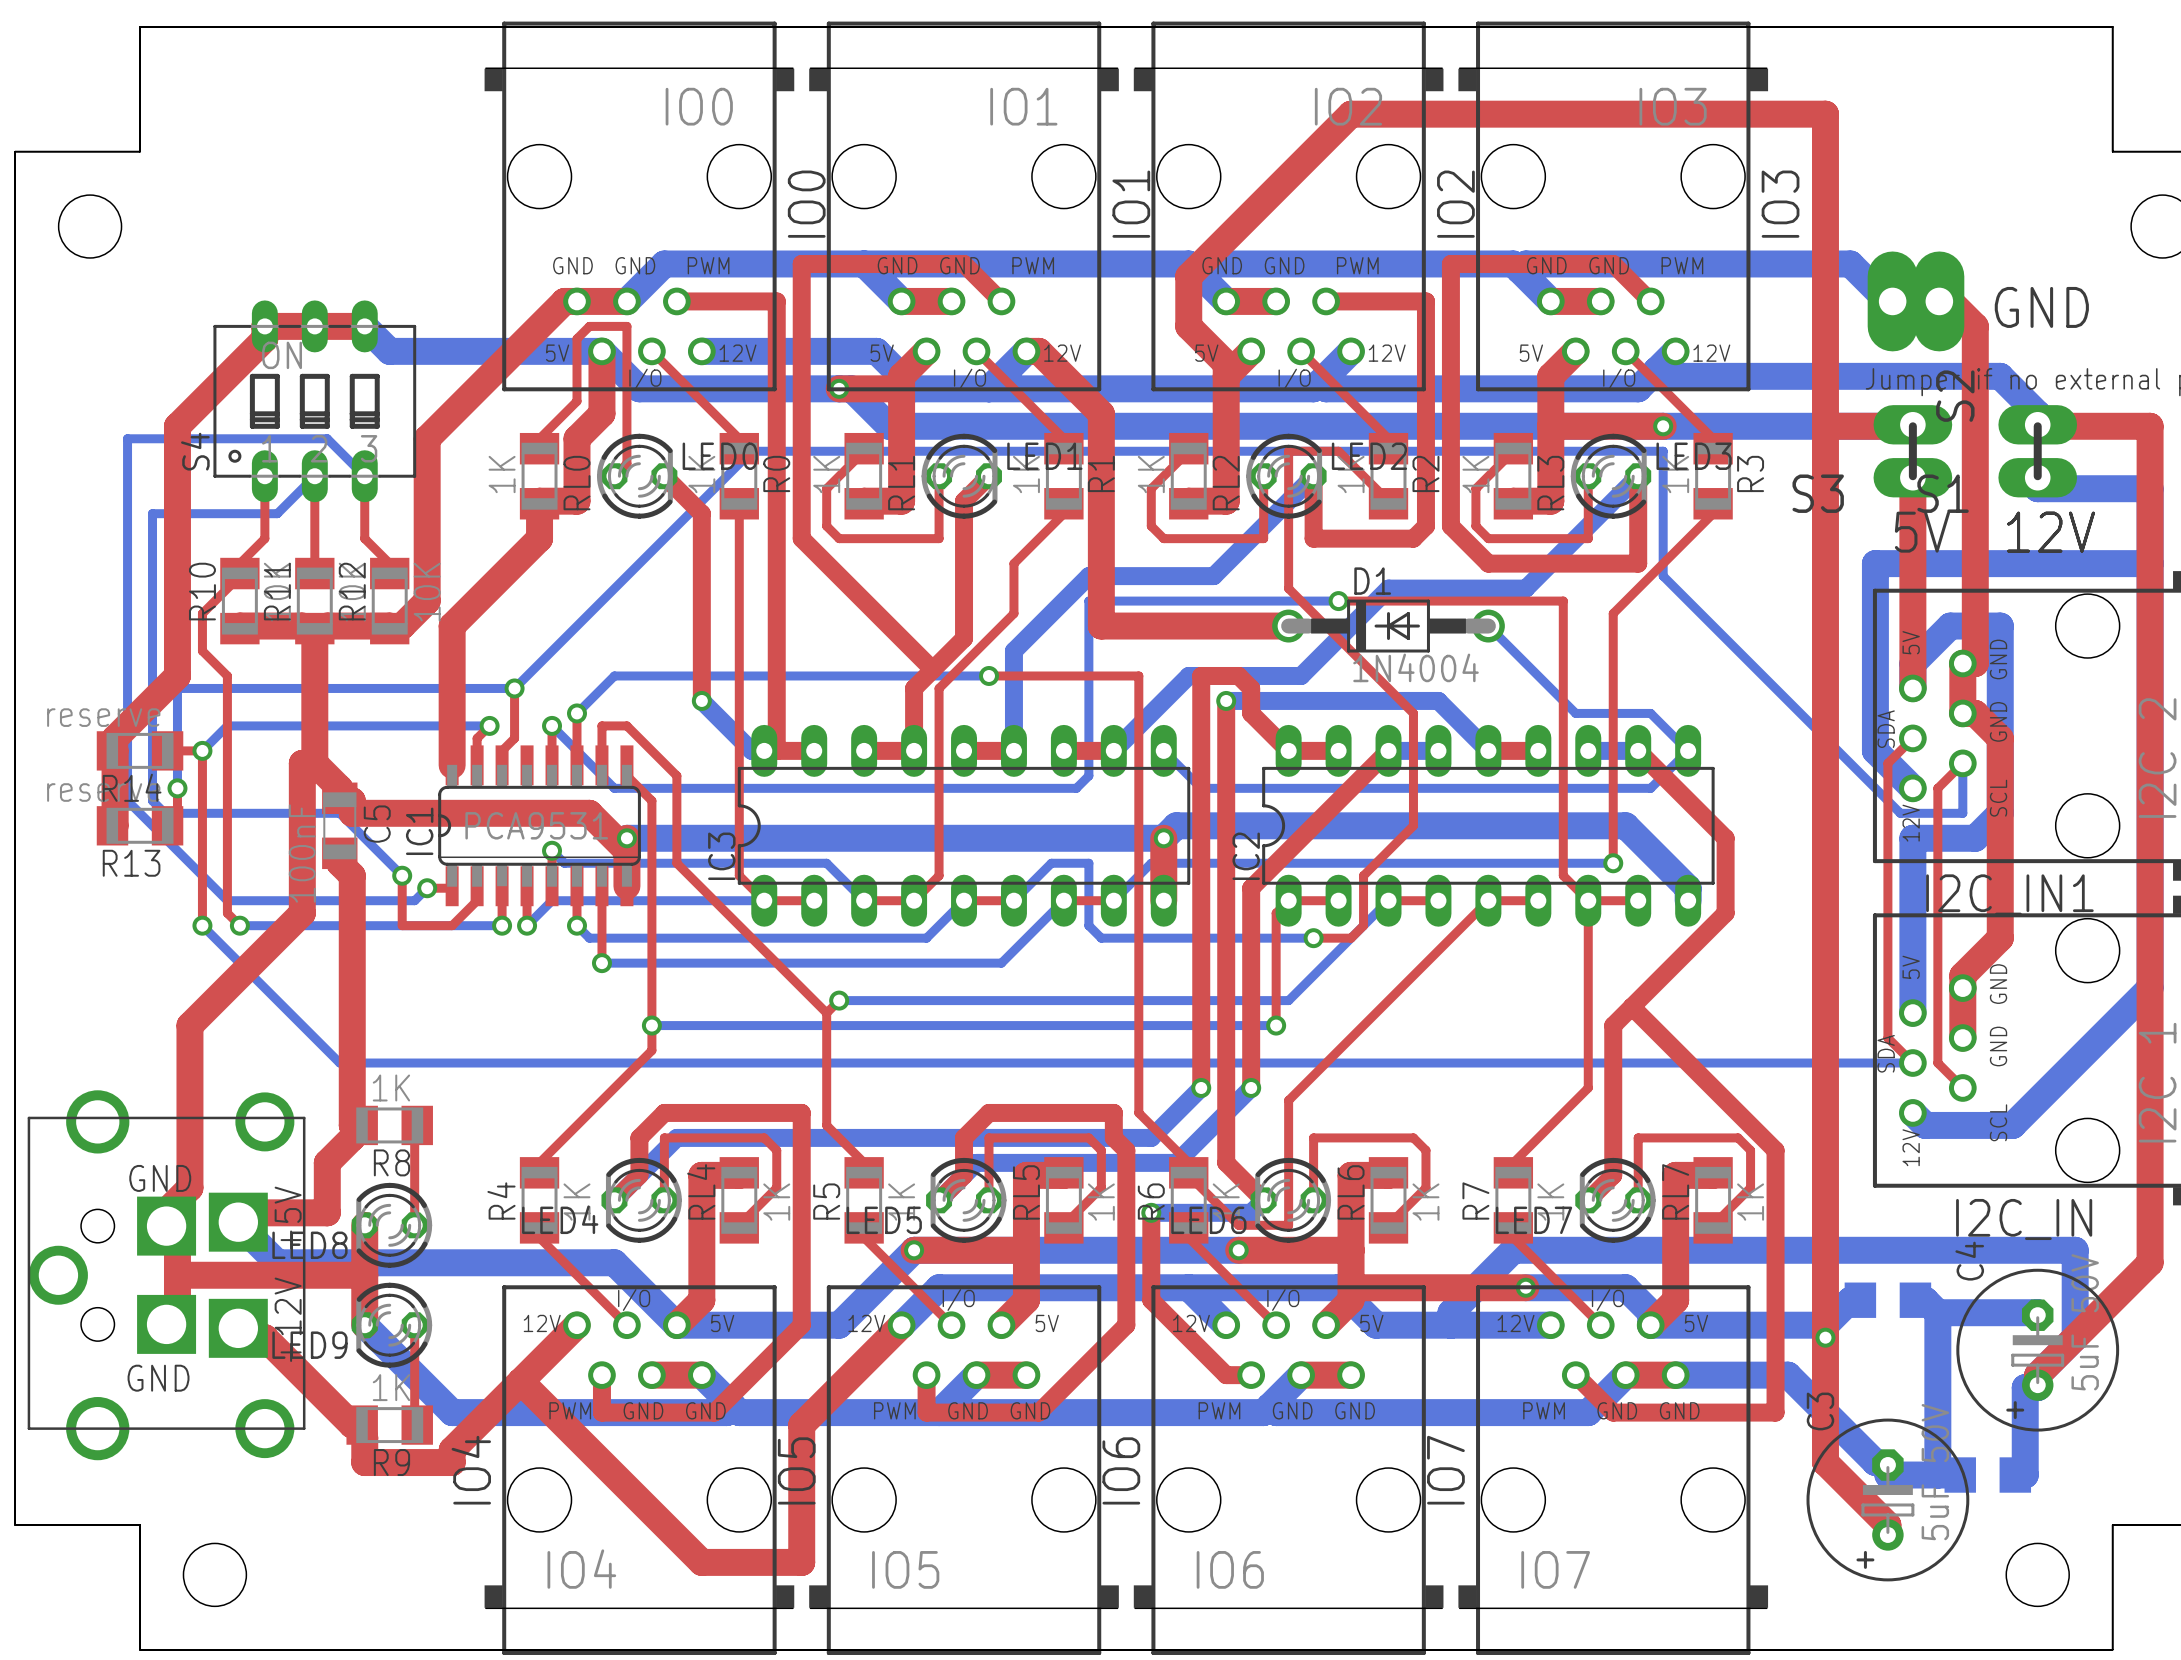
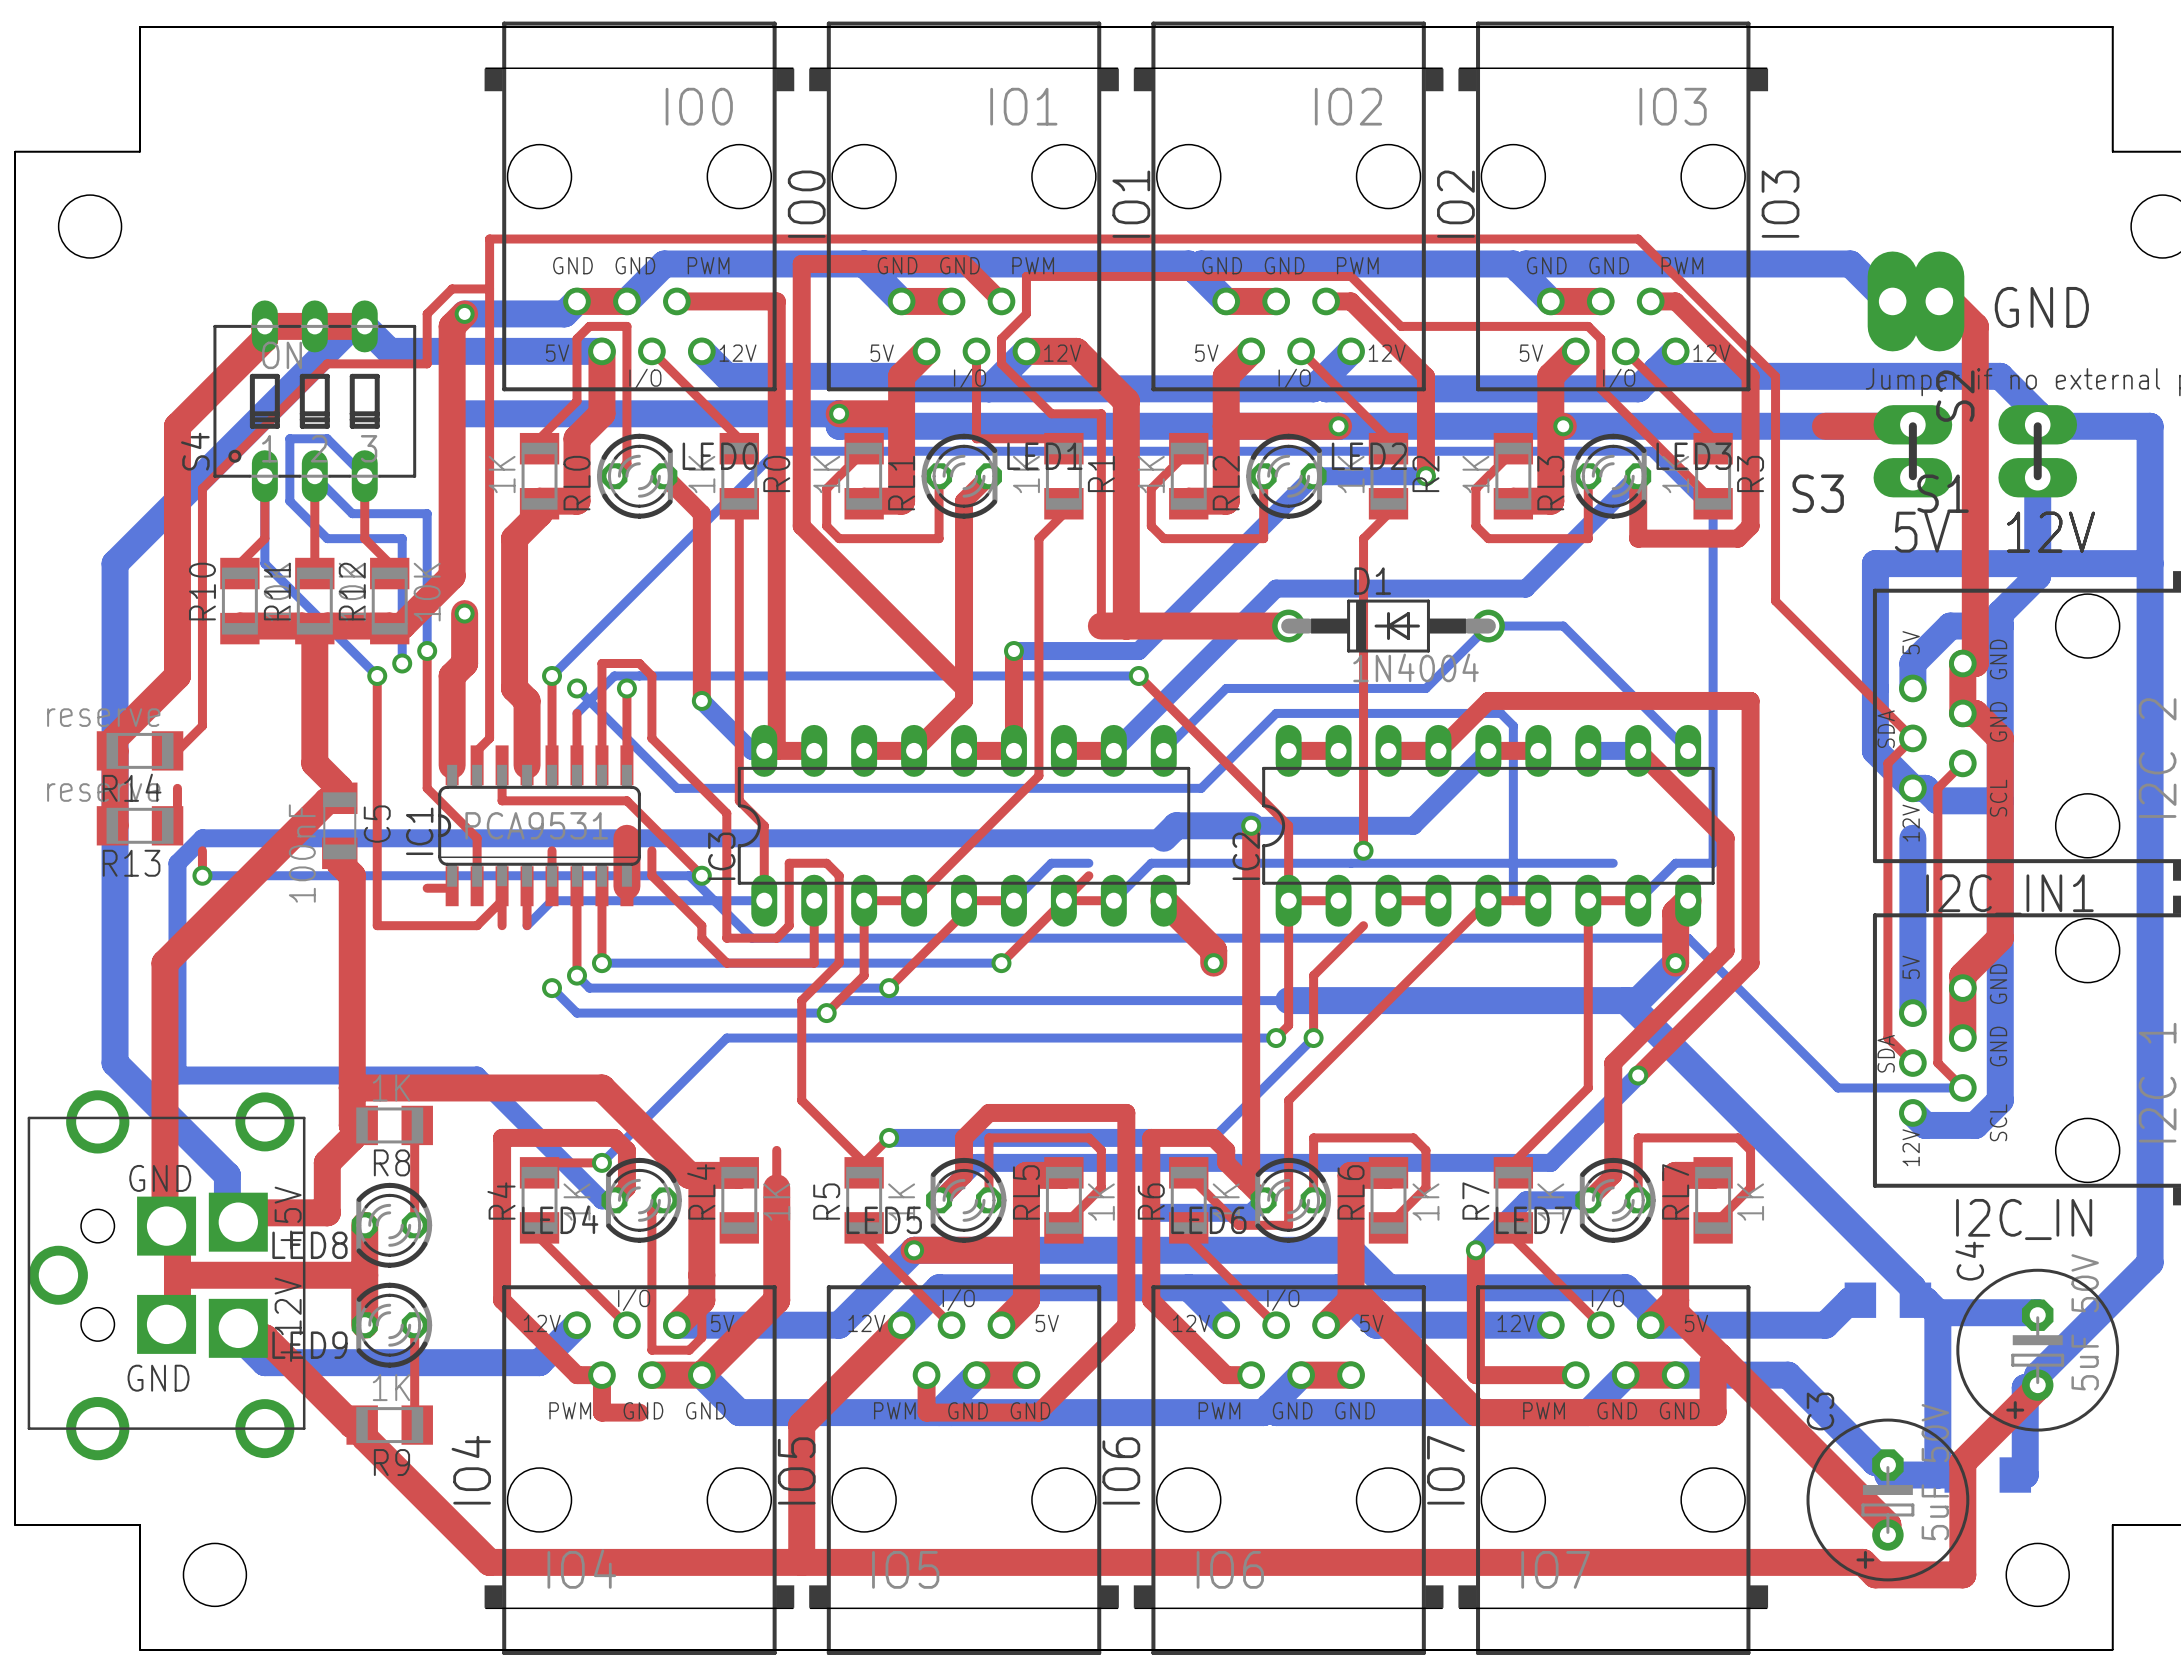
top track: (576, 301) (564, 301) (427, 438) (427, 601) -> (464, 313) (452, 326) (452, 576) (427, 601)
bottom track: none -> (576, 301) (564, 313) (464, 313)
top track: (1351, 301) (1425, 301) (1425, 376) -> (1351, 301) (1425, 376)
top track: (1650, 301) (1613, 263) (1450, 263) (1450, 526) (1488, 563) (1638, 563) (1638, 538) -> (1650, 301) (1675, 301) (1750, 376) (1750, 526) (1738, 538) (1638, 538)
via: none -> (464, 313)
bottom track: (601, 351) (639, 388) (851, 388) (889, 426) -> (464, 413) (839, 413) (839, 426) (889, 426)
bottom track: (701, 351) (876, 351) (901, 376) -> (701, 351) (726, 376) (901, 376)
top track: (976, 351) (1063, 438) -> (976, 351) (976, 438) (1063, 438)
top track: (1038, 351) (1101, 413) -> (1038, 351) (1076, 351) (1126, 401) (1126, 626)
top track: (1226, 376) (1226, 363) (1188, 326) (1188, 276) (1351, 114) (1825, 114) (1825, 1462) -> (1675, 1300) (1675, 1312) (1825, 1462)
top track: (839, 388) (901, 388) -> (839, 413) (901, 413)
via position: (839, 388) -> (839, 413)
top track width: thick (1101, 413) (1101, 626) -> thin (1101, 413) (1101, 626)
top track: (2037, 424) (2150, 426) (2150, 1262) (2037, 1375) (2037, 1385) -> (801, 1562) (1862, 1562) (1875, 1574) (1962, 1574) (1962, 1462) (2037, 1387) (2037, 1385)
top track: none -> (1226, 426) (1338, 426)
via: none -> (1338, 426)
top track: (1563, 426) (1663, 426) -> none
via position: (1663, 426) -> (1563, 426)
bottom track: (289, 438) (127, 438) (127, 800) (227, 900) (414, 900) (427, 888) -> (289, 438) (289, 501) (327, 538) (402, 538) (402, 663)
bottom track: (776, 451) (751, 451) (514, 688) (177, 688) (177, 788) -> (776, 451) (552, 675)
bottom track: (1650, 451) (1663, 451) (1663, 576) (1900, 813) (1962, 813) (1962, 763) -> (1650, 451) (1713, 513) (1713, 863) (1675, 863) (1638, 900)
bottom track: none -> (264, 476) (264, 563) (377, 675)
bottom track: (314, 476) (277, 513) (152, 513) (152, 800) (164, 813) (339, 813) (402, 875) -> (314, 476) (352, 513) (427, 513) (427, 651)
top track: (1313, 476) (1313, 538) (1413, 538) (1425, 526) (1425, 476) -> none
bottom track: none -> (1313, 476) (1425, 476)
via: none -> (1425, 476)
top track: (1912, 477) (1912, 688) -> none
bottom track: (2037, 488) (2150, 488) -> (2037, 424) (2150, 426) (2150, 488)
bottom track: none -> (2037, 488) (2037, 576) (2000, 613) (2000, 626)
top track: (1388, 503) (1388, 501) (1338, 451) (1288, 451) (1288, 588) (1413, 713) (1413, 825) (1363, 875) (1363, 925) -> (1388, 503) (1388, 513) (1363, 538) (1363, 850)
top track: (1713, 503) (1713, 513) (1613, 613) (1613, 863) -> (1713, 503) (1713, 501) (1600, 388) (1600, 338) (1588, 326) (1400, 326) (1351, 276) (1026, 276) (1026, 313) (1001, 338) (1001, 363) (1051, 413) (1101, 413)
top track: (539, 513) (539, 538) (452, 626) (452, 675) -> (539, 513) (514, 538) (514, 688) (527, 700) (527, 765)
top track: (801, 526) (801, 538) (932, 669) -> (801, 526) (964, 688)
top track: (1038, 538) (1013, 563) (1013, 613) (939, 688) (939, 875) -> (1038, 538) (1038, 775) (939, 875)
top track: (239, 573) (239, 576) (202, 613) -> (489, 288) (452, 288) (427, 313) (427, 363) (327, 363) (202, 488) (202, 613)
bottom track: (1213, 576) (1088, 576) (1013, 651) (1013, 750) -> (1213, 576) (1138, 651) (1013, 651)
bottom track: (1388, 588) (1301, 675) (1188, 675) -> (1388, 588) (1276, 588) (1188, 675)
top track: (1338, 601) (1563, 601) (1563, 875) (1588, 900) -> none
bottom track: (1338, 601) (1088, 601) (1088, 775) (1076, 788) -> (1513, 900) (1513, 725) (1500, 713) (1276, 713) (1201, 788) (1076, 788)
via: (1338, 601) -> none
top track: none -> (464, 613) (464, 663) (452, 675)
via: none -> (464, 613)
bottom track: (1488, 626) (1575, 713) (1650, 713) -> none
top track: (964, 638) (914, 688) (914, 750) -> (964, 638) (964, 700) (914, 750)
top track: (202, 651) (227, 675) (227, 913) (239, 925) -> (202, 651) (202, 725) (177, 750)
top track: none -> (427, 651) (427, 788) (477, 838) (477, 886)
via: none -> (427, 651)
top track: none -> (1013, 651) (1013, 750)
via: none -> (402, 663)
via: none -> (377, 675)
top track: none -> (552, 675) (552, 725)
via: none -> (552, 675)
top track: (988, 675) (1138, 675) (1138, 1112) (1188, 1162) (1188, 1172) -> none
bottom track: none -> (988, 675) (1138, 675)
via position: (988, 675) -> (1013, 651)
top track: none -> (1138, 675) (1288, 825) (1288, 1025) (1276, 1038)
via: none -> (1138, 675)
top track: (514, 688) (514, 738) (502, 750) (502, 765) -> (701, 875) (626, 800) (502, 800) (502, 765)
via: (514, 688) -> none
via: none -> (576, 688)
via: none -> (626, 688)
top track: (1226, 700) (1226, 1150) -> (1151, 1212) (1151, 1137) (1213, 1137) (1226, 1150)
bottom track: (1226, 700) (1438, 700) (1488, 750) -> (1413, 825) (1488, 750)
via: (1226, 700) -> none
via: (576, 713) -> none
top track: (489, 725) (477, 738) (477, 750) -> (1912, 738) (1775, 601) (1775, 376) (1638, 239) (489, 239) (489, 738) (477, 750)
bottom track: (489, 725) (227, 725) (202, 750) -> none
via: (489, 725) -> none
bottom track: (552, 725) (614, 788) (676, 788) -> (576, 688) (676, 788)
via: (552, 725) -> none
top track: (601, 725) (626, 725) (676, 775) (676, 863) (826, 1013) (826, 1125) -> (601, 725) (601, 663) (639, 663) (651, 675) (651, 738) (726, 813) (726, 938) (776, 938) (789, 925) (789, 863) (826, 863) (839, 875) (839, 963) (801, 1000) (801, 1100) (826, 1125)
top track: (177, 750) (202, 750) (202, 850) -> none
via: (202, 750) -> none
bottom track: (1163, 750) (1201, 788) (1650, 788) (1688, 750) -> (1163, 750) (1226, 688) (1425, 688) (1488, 626) (1563, 626) (1650, 713)
top track: (1288, 750) (1251, 713) (1251, 688) (1238, 675) (1201, 675) (1201, 1087) -> none
top track: (1388, 750) (1251, 888) -> (1251, 825) (1251, 888)
top track: none -> (1388, 750) (1438, 750) (1488, 700) (1750, 700) (1750, 963) (1638, 1075)
top track: (314, 763) (302, 763) (302, 913) (189, 1025) (189, 1187) (164, 1212) -> (339, 798) (327, 800) (164, 963) (164, 1212)
top track: (626, 765) (626, 775) (651, 800) (651, 850) -> (626, 765) (626, 688)
via: (177, 788) -> none
bottom track: none -> (1912, 788) (1925, 788) (1937, 800) (2000, 800)
top track: (339, 798) (352, 800) (352, 813) (589, 813) (626, 850) -> none
top track: (739, 800) (739, 875) (764, 900) (814, 900) -> (739, 800) (764, 825) (764, 900)
bottom track: (2000, 813) (1975, 838) (1912, 838) -> none
bottom track width: thick (1251, 825) (1413, 825) -> thin (1251, 825) (1413, 825)
via: none -> (1251, 825)
bottom track: (1413, 825) (1625, 825) (1688, 888) (1688, 900) -> none
bottom track width: thick (626, 838) (1163, 838) -> thin (626, 838) (1163, 838)
via: (626, 838) -> none
top track: (1163, 838) (1163, 900) -> (1213, 963) (1213, 950) (1163, 900)
via: (1163, 838) -> none
bottom track: (552, 850) (564, 863) (826, 863) (864, 900) -> none
via: (552, 850) -> none
via: none -> (1363, 850)
bottom track: (1088, 863) (1088, 925) (1101, 938) -> none
via: (1613, 863) -> none
top track: (202, 875) (202, 925) -> (576, 925) (576, 975)
bottom track: none -> (202, 875) (701, 875)
via: none -> (202, 875)
top track: (402, 875) (402, 925) -> (377, 675) (377, 925) (402, 925)
via: (402, 875) -> none
top track: (651, 875) (651, 1050) (539, 1162) -> (601, 1162) (539, 1162)
top track: none -> (651, 875) (701, 925) (701, 938) (726, 963) (814, 963) (814, 900)
via: none -> (701, 875)
top track: none -> (1088, 875) (1001, 963)
top track: (477, 886) (477, 900) (452, 925) -> (502, 900) (477, 925) (452, 925)
via: (427, 888) -> none
top track: none -> (864, 900) (864, 975) (839, 1000)
top track: none -> (964, 900) (964, 913) (889, 988)
bottom track: (964, 900) (926, 938) -> (1101, 938) (926, 938)
bottom track: (1063, 900) (1001, 963) -> none
top track: (1288, 900) (1276, 913) (1276, 1025) -> none
bottom track: (1388, 900) (1288, 1000) -> (1675, 963) (1638, 1000) (1288, 1000)
top track: none -> (1688, 900) (1675, 913) (1675, 963)
top track: (1725, 913) (1613, 1025) (1613, 1063) -> (1725, 913) (1725, 950) (1613, 1063)
bottom track: (202, 925) (339, 1063) (1912, 1063) -> none
via: (202, 925) -> none
bottom track: (239, 925) (502, 925) -> none
via: (239, 925) -> none
via: (502, 925) -> none
via: (527, 925) -> none
bottom track: (576, 925) (589, 938) (751, 938) -> (689, 875) (751, 938)
via: (576, 925) -> none
top track: (1313, 938) (1351, 938) -> (1313, 1038) (1313, 975) (1351, 938)
bottom track: none -> (1313, 938) (1688, 938) (1837, 1087) (1962, 1087)
via: (1313, 938) -> none
via: none -> (1001, 963)
via: none -> (1213, 963)
via: none -> (1675, 963)
bottom track: none -> (576, 975) (589, 988) (889, 988)
via: none -> (576, 975)
bottom track: none -> (552, 988) (576, 1013) (826, 1013)
via: none -> (552, 988)
via: none -> (889, 988)
bottom track: (2150, 988) (2012, 1125) (1975, 1125) -> (2000, 813) (2000, 1100) (1975, 1125)
via position: (839, 1000) -> (826, 1013)
bottom track: none -> (1625, 1000) (1912, 1287) (1915, 1300)
top track: (1631, 1006) (1775, 1150) (1775, 1412) (1713, 1412) -> (1719, 1356) (1713, 1362) (1713, 1412)
bottom track: (651, 1025) (1276, 1025) -> none
via: (651, 1025) -> none
via position: (1276, 1025) -> (1276, 1038)
bottom track: none -> (1276, 1038) (726, 1038) (601, 1162)
via: none -> (1313, 1038)
via: none -> (1638, 1075)
top track: none -> (352, 1087) (601, 1087) (689, 1175) (701, 1175)
bottom track: (1201, 1087) (1151, 1137) -> (1313, 1038) (1213, 1137) (1151, 1137)
via: (1201, 1087) -> none
top track: none -> (1251, 1087) (1251, 1175) (1244, 1181)
bottom track: (1251, 1087) (1176, 1162) -> (1638, 1075) (1550, 1162) (1176, 1162)
via: (1251, 1087) -> none
top track: (1113, 1112) (1113, 1137) (1126, 1150) -> (1113, 1112) (1126, 1112) (1126, 1150)
top track: none -> (889, 1137) (864, 1162)
bottom track: (889, 1137) (676, 1137) (614, 1200) -> (626, 838) (202, 838) (177, 863) (177, 1075) (477, 1075) (601, 1200) (614, 1200)
via: none -> (889, 1137)
top track: (776, 1150) (764, 1137) (664, 1137) (664, 1200) -> (701, 1300) (701, 1337) (689, 1350) (651, 1350) (651, 1212) (664, 1200)
via: none -> (601, 1162)
top track: (626, 1187) (639, 1175) (639, 1137) (664, 1112) (801, 1112) (801, 1325) (714, 1412) (639, 1412) -> (626, 1187) (626, 1150) (614, 1137) (502, 1137) (502, 1300) (576, 1375) (601, 1375)
top track: (776, 1187) (739, 1225) (739, 1227) -> (776, 1187) (776, 1300) (701, 1375)
bottom track: none -> (1588, 1200) (1525, 1200) (1475, 1250)
via: (1151, 1212) -> none
bottom track: (238, 1222) (277, 1262) (614, 1262) (676, 1325) -> (238, 1222) (227, 1212) (227, 1175) (115, 1063) (115, 563) (352, 326) (364, 326)
top track: (1238, 1250) (1351, 1250) -> none
bottom track: none -> (1238, 1250) (1351, 1250) (1388, 1287) (1525, 1287)
via: (1238, 1250) -> none
top track: (1351, 1287) (1525, 1287) -> none
via position: (1525, 1287) -> (1475, 1250)
top track: none -> (1351, 1300) (1363, 1300) (1475, 1412) (1613, 1412)
bottom track: (364, 1325) (452, 1412) (726, 1412) (733, 1406) -> none
top track: (576, 1325) (452, 1450) (452, 1462) (364, 1462) (364, 1437) -> none
bottom track: none -> (576, 1325) (539, 1362) (264, 1362) (239, 1337) (238, 1328)
bottom track: (1450, 1325) (1450, 1312) (1513, 1250) (2075, 1250) (2075, 1337) -> (2150, 988) (2150, 1262) (2075, 1337)
via: (1825, 1337) -> none
top track: (1575, 1375) (1613, 1412) -> (1575, 1375) (1475, 1375) (1475, 1250)
top track: (520, 1381) (701, 1562) -> (364, 1437) (489, 1562) (701, 1562)
top track width: thin (1613, 1412) (1713, 1412) -> thick (1613, 1412) (1713, 1412)

